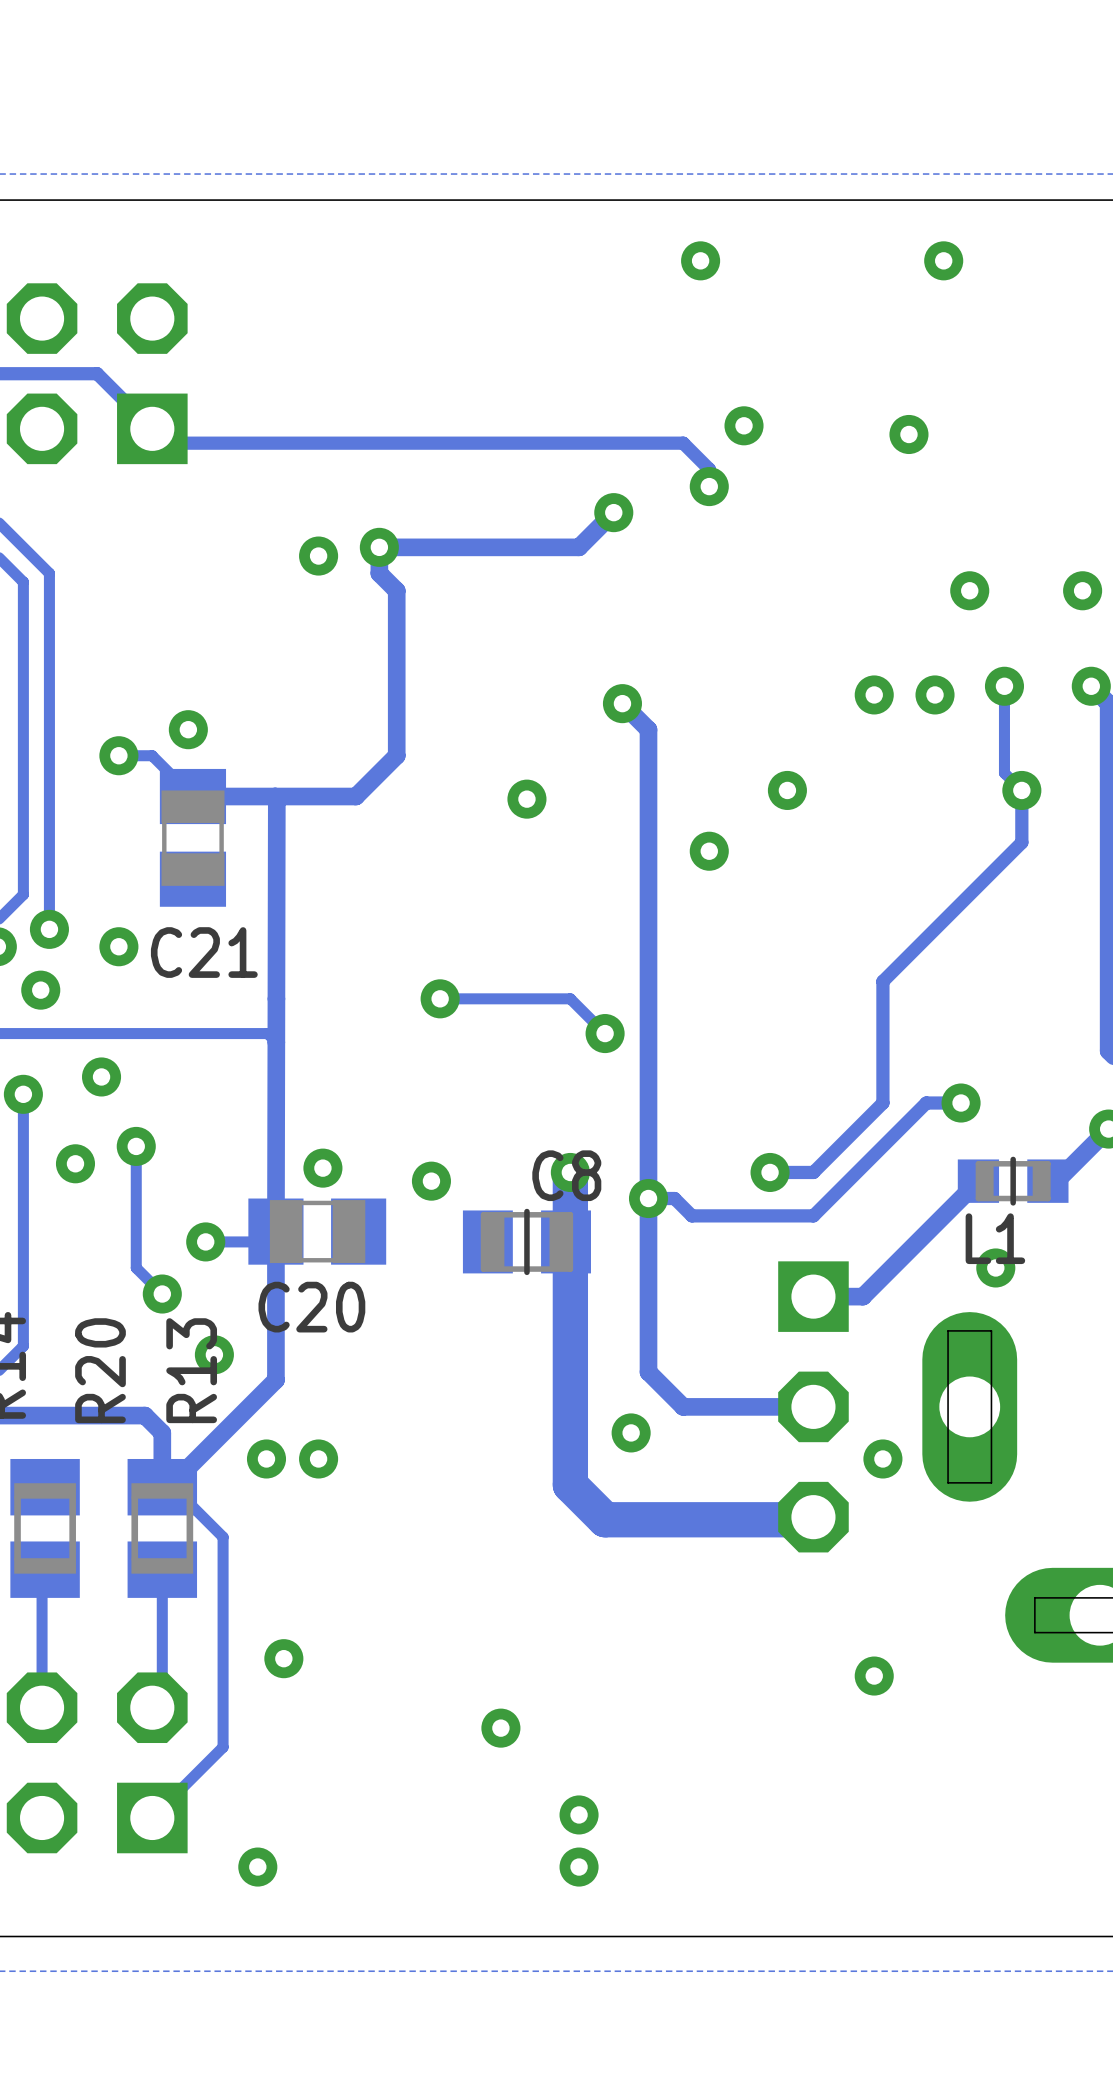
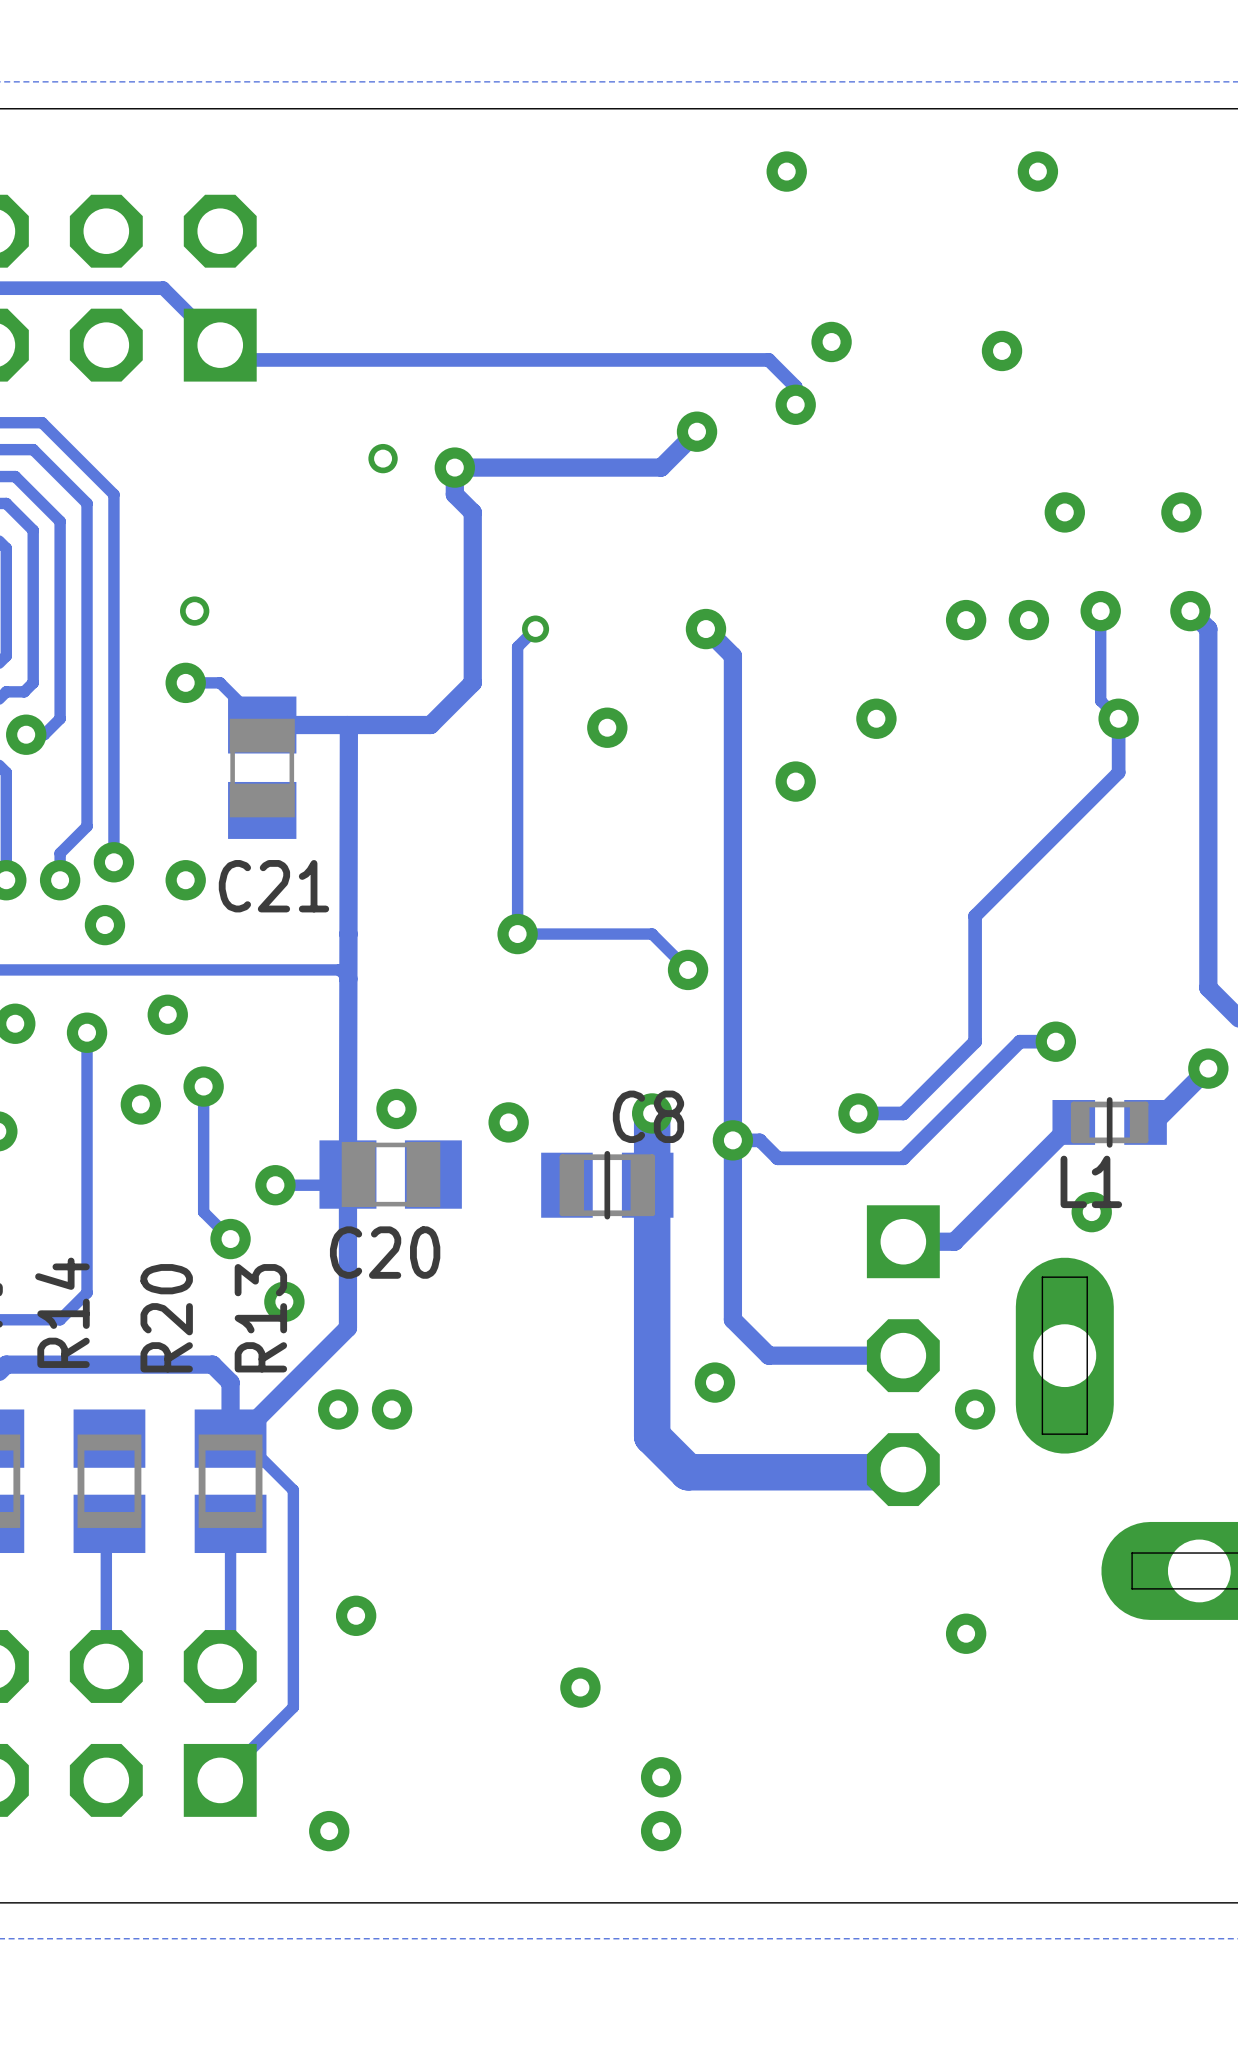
via size: [299, 536, 339, 576] -> [368, 443, 398, 474]
via: none -> (194, 611)
track: none -> (535, 629) (517, 646) (517, 934)
via: none -> (535, 629)
via: (188, 729) -> none

